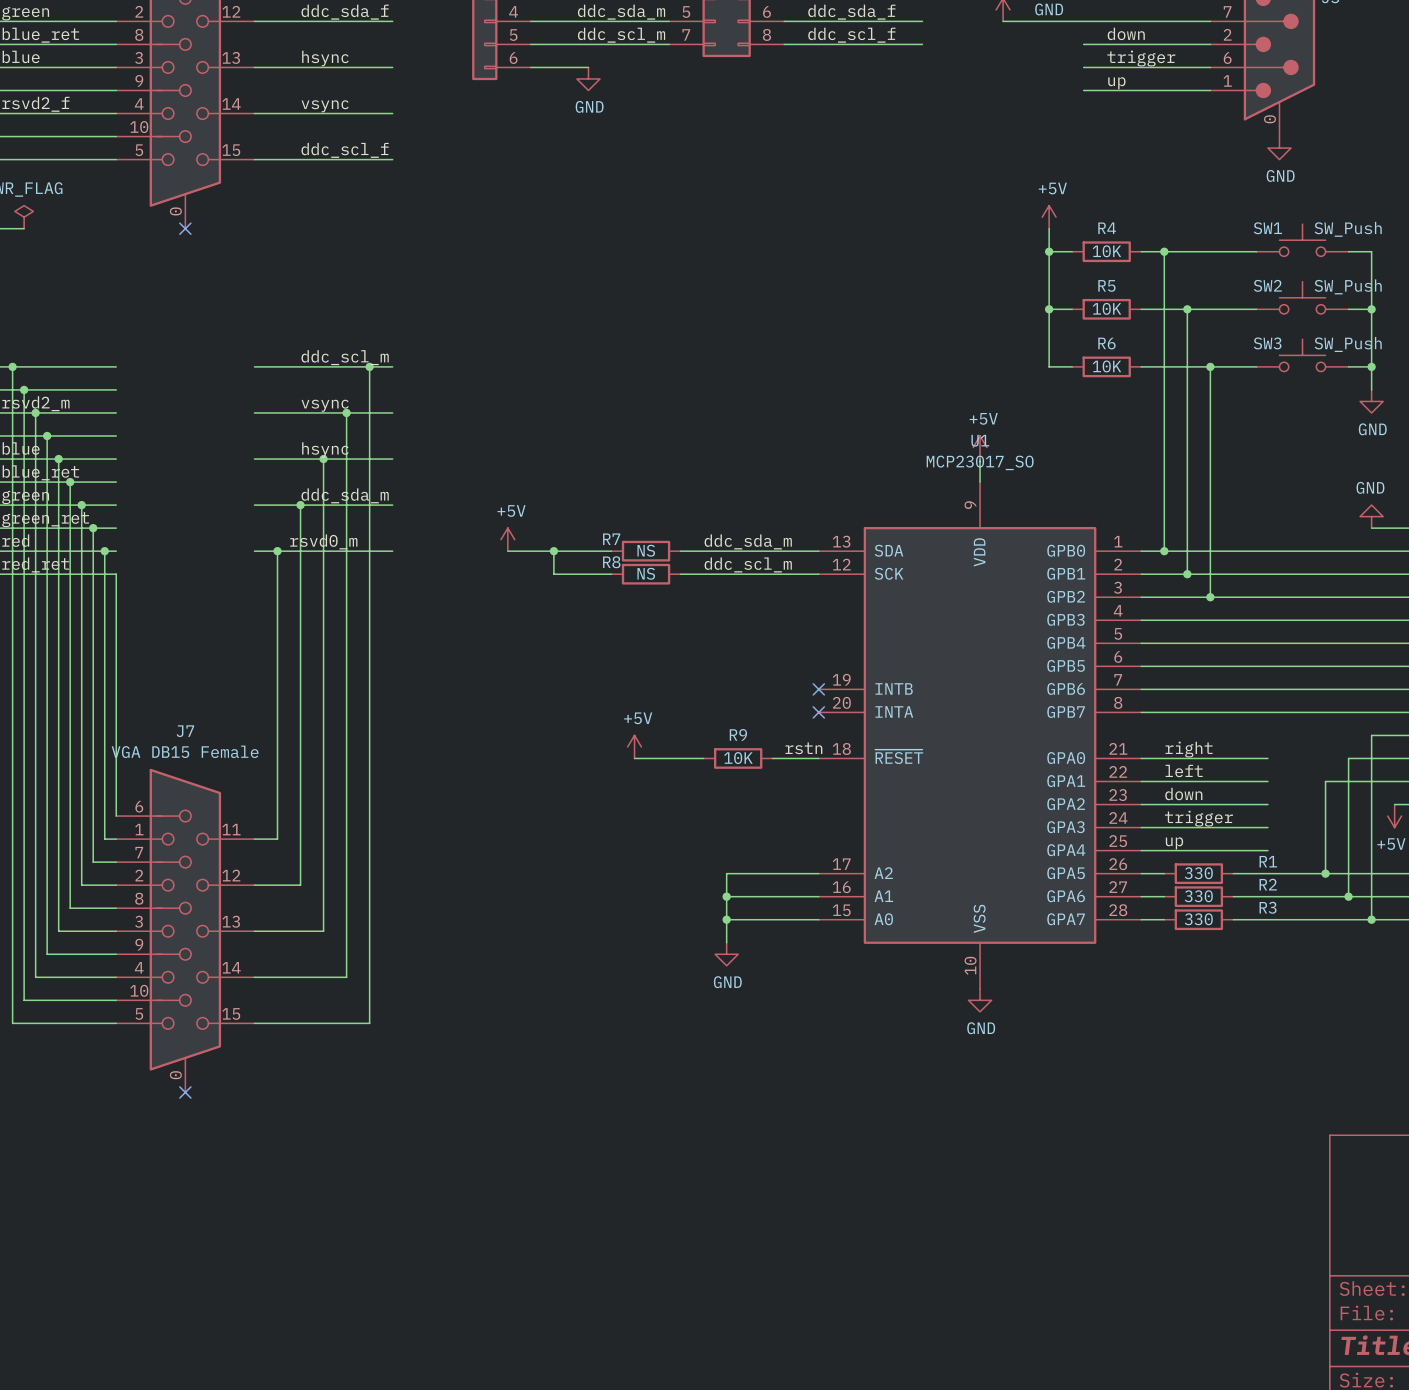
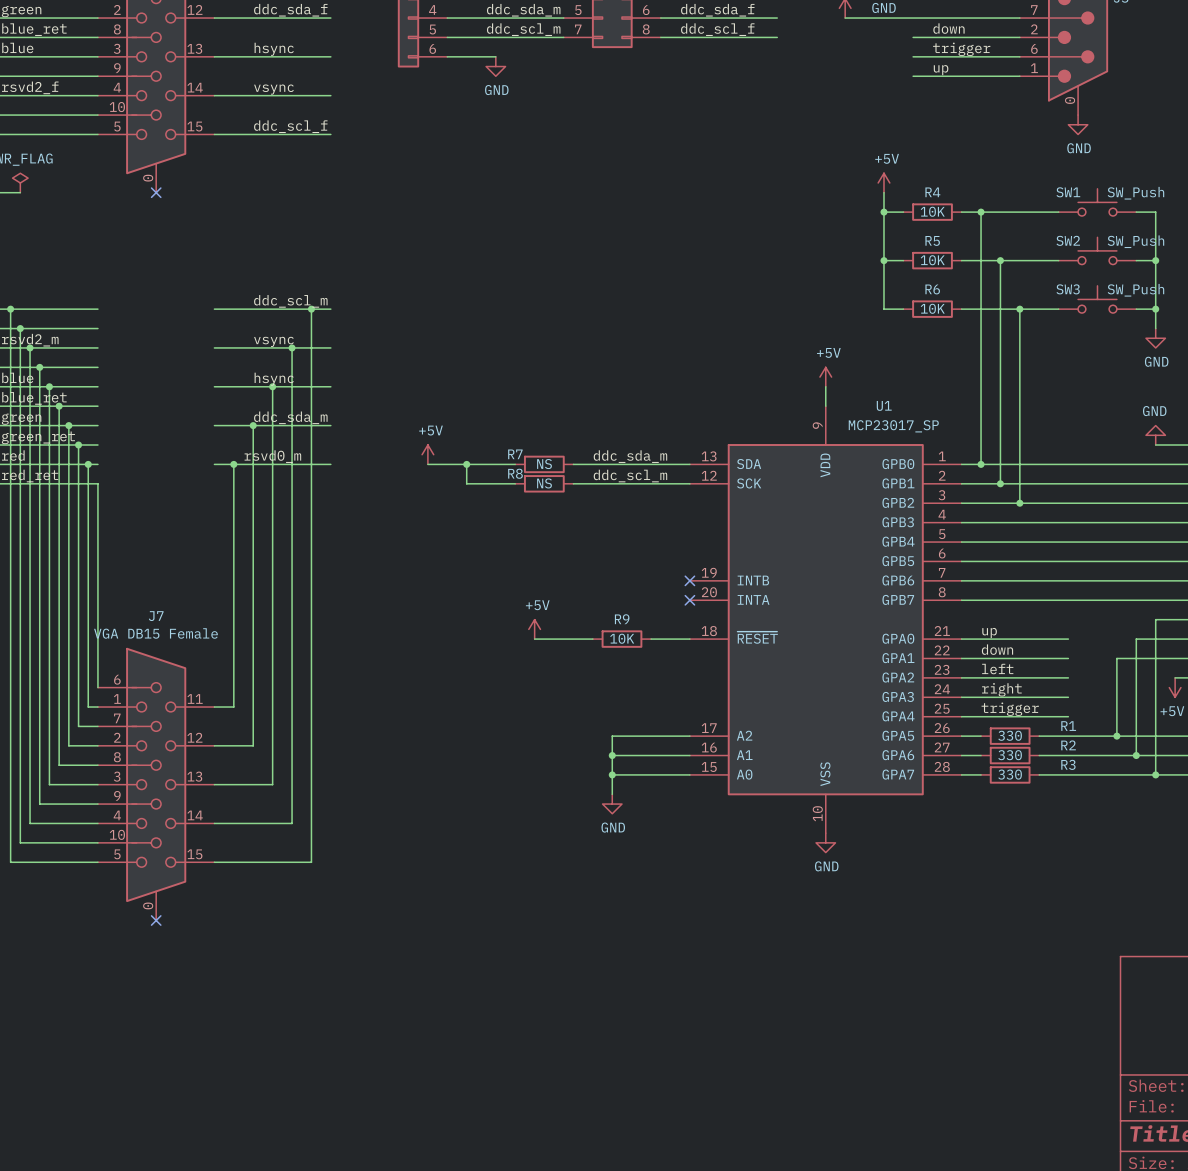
U1 name position: U1 (980, 440) -> U1 (884, 405)
U1 value: MCP23017_SO (980, 462) -> MCP23017_SP (893, 426)
label: rstn (803, 748) -> none
label: right (1189, 749) -> up (989, 632)
label: left (1184, 770) -> down (997, 649)
label: down (1183, 794) -> left (997, 669)
label: trigger (1198, 818) -> right (1001, 689)
label: up (1174, 843) -> trigger (1010, 709)

